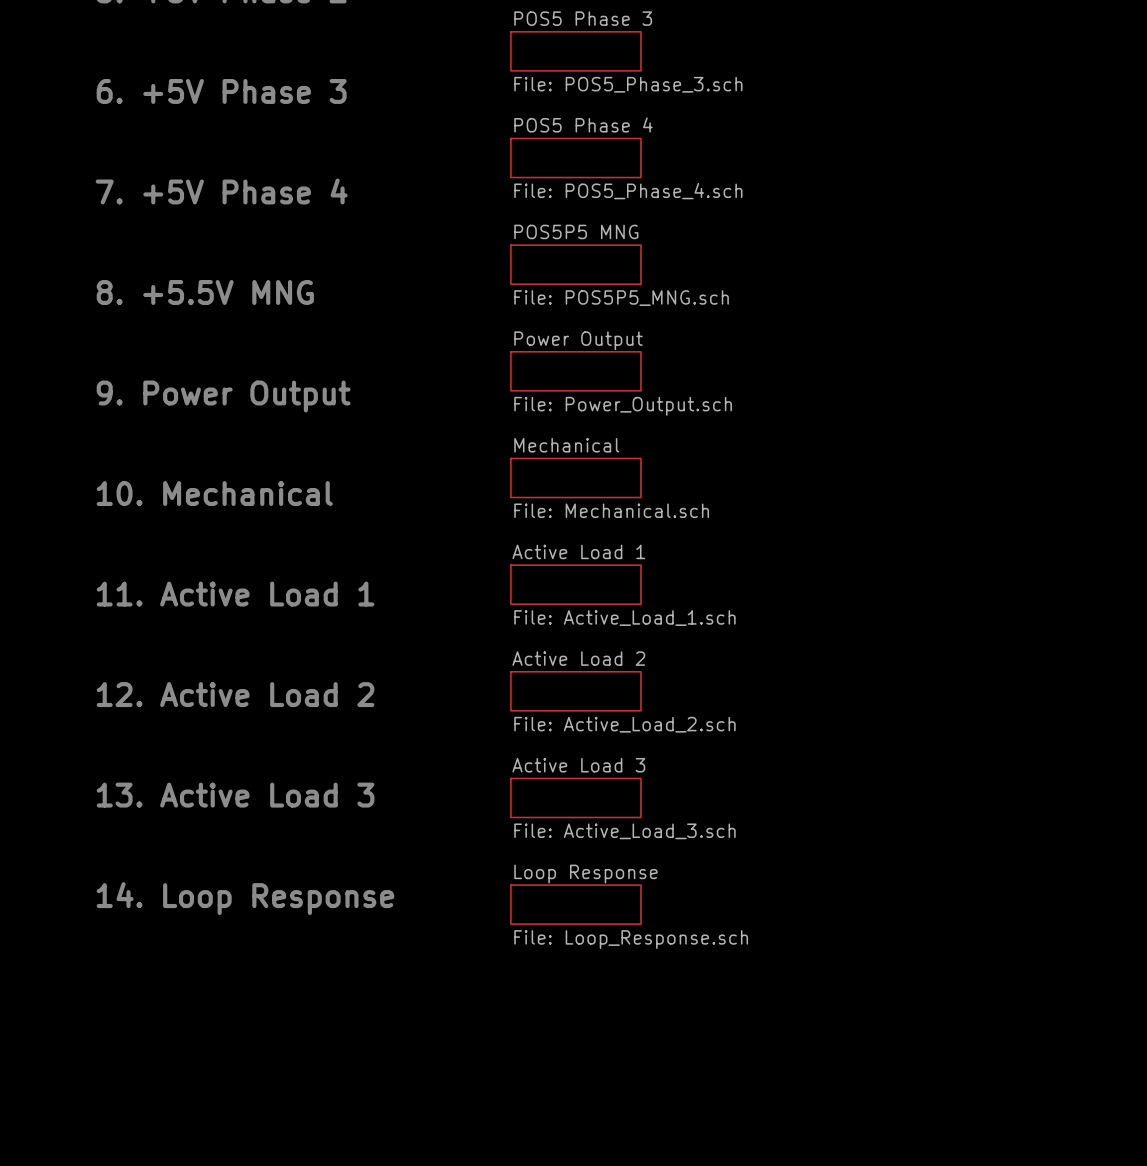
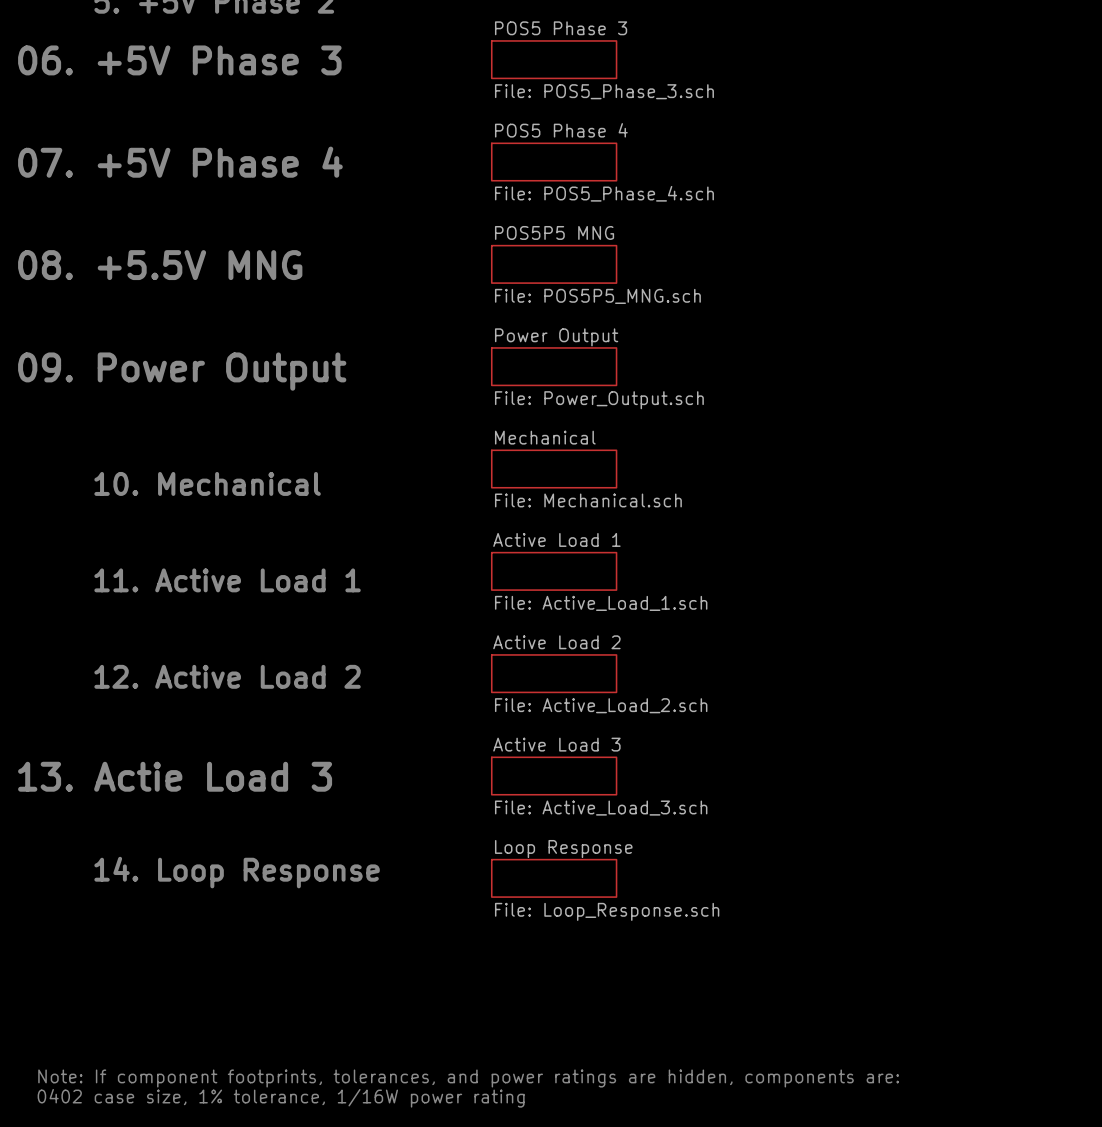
text: 6. +5V Phase 3 (221, 91) -> 06. +5V Phase 3 (179, 60)
text: 7. +5V Phase 4 (221, 191) -> 07. +5V Phase 4 (180, 162)
text: 8. +5.5V MNG (205, 292) -> 08. +5.5V MNG (160, 265)
text: 9. Power Output (223, 396) -> 09. Power Output (182, 371)
text: 13. Active Load 3 (235, 795) -> 13. Actie Load 3 (175, 776)
text: none -> Note: If component footprints, tolerances, and power ratings are hidden, components are: (468, 1078)
text: none -> 0402 case size, 1% tolerance, 1/16W power rating (281, 1098)

